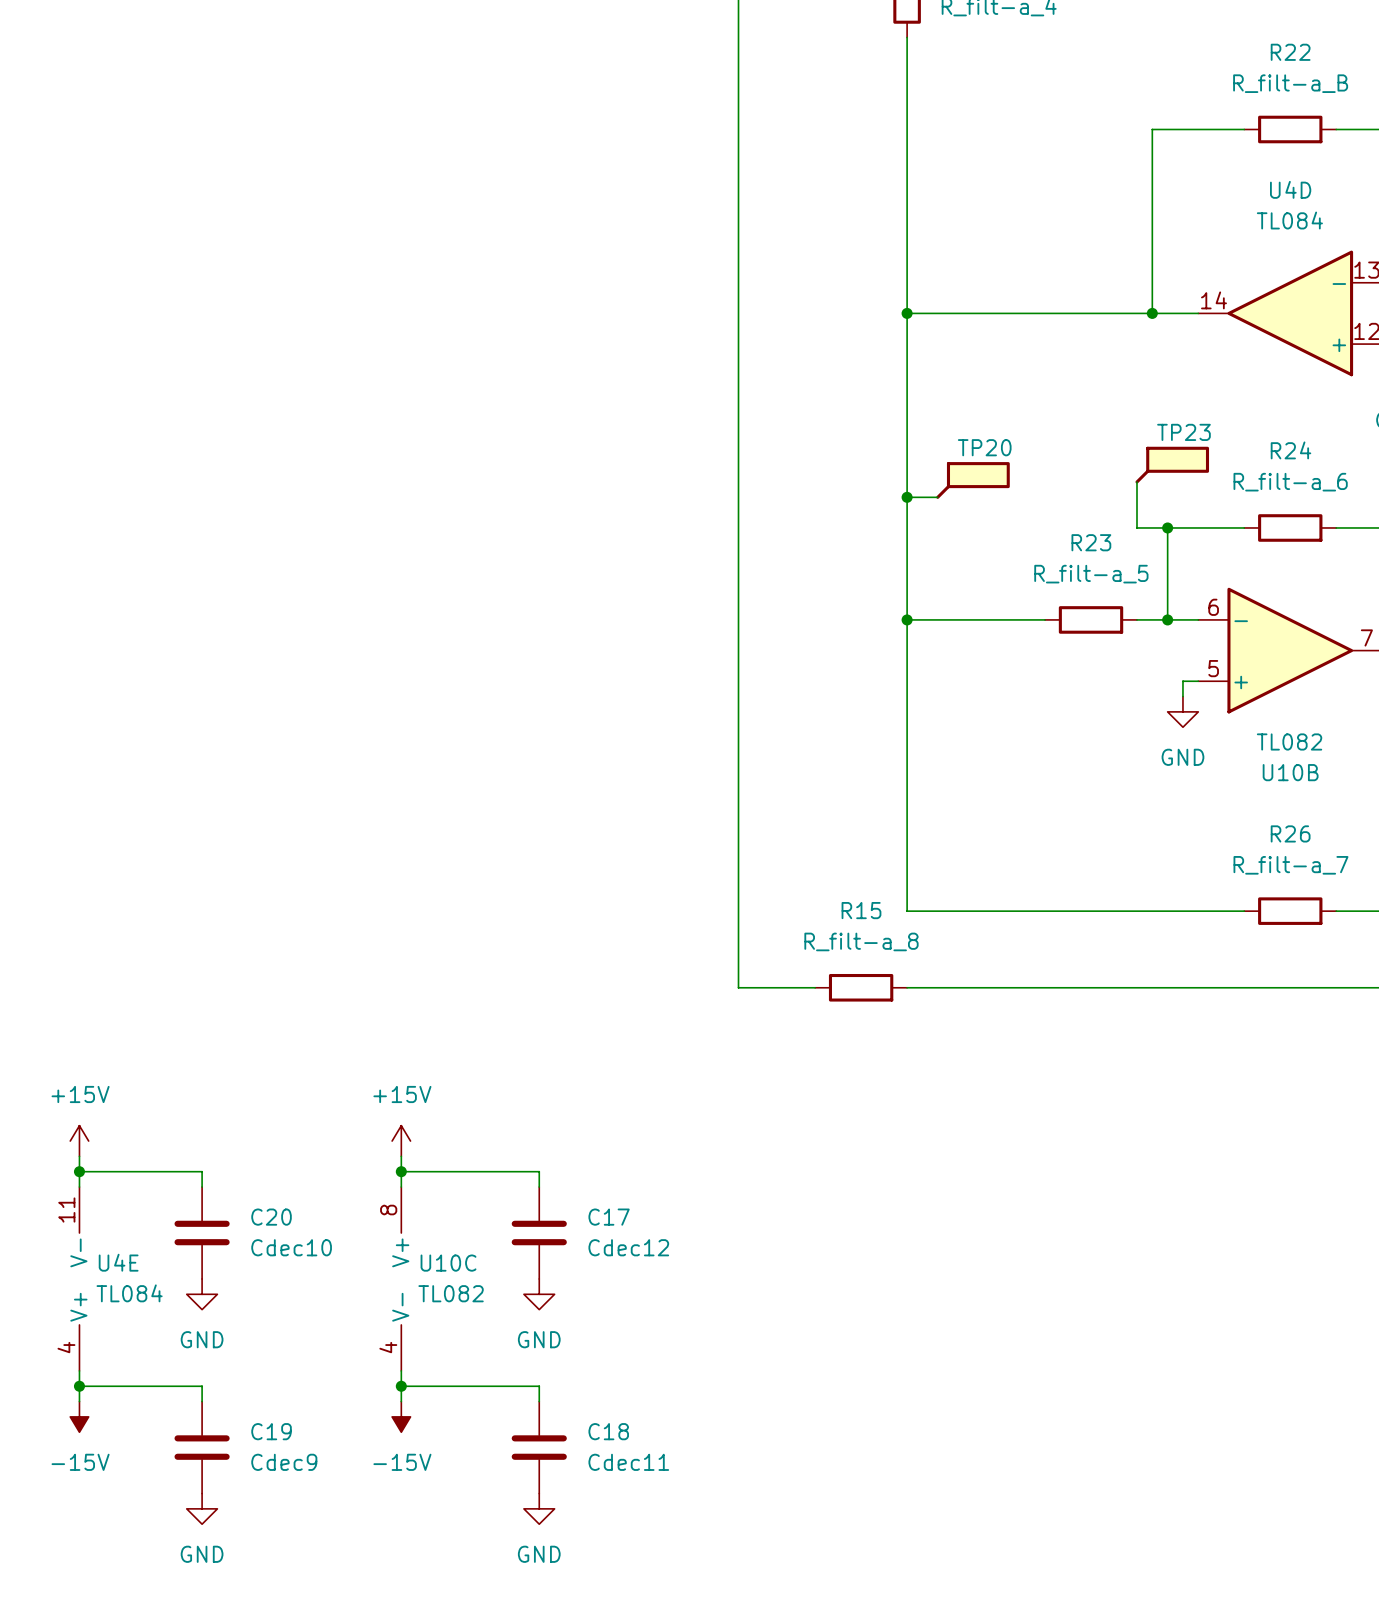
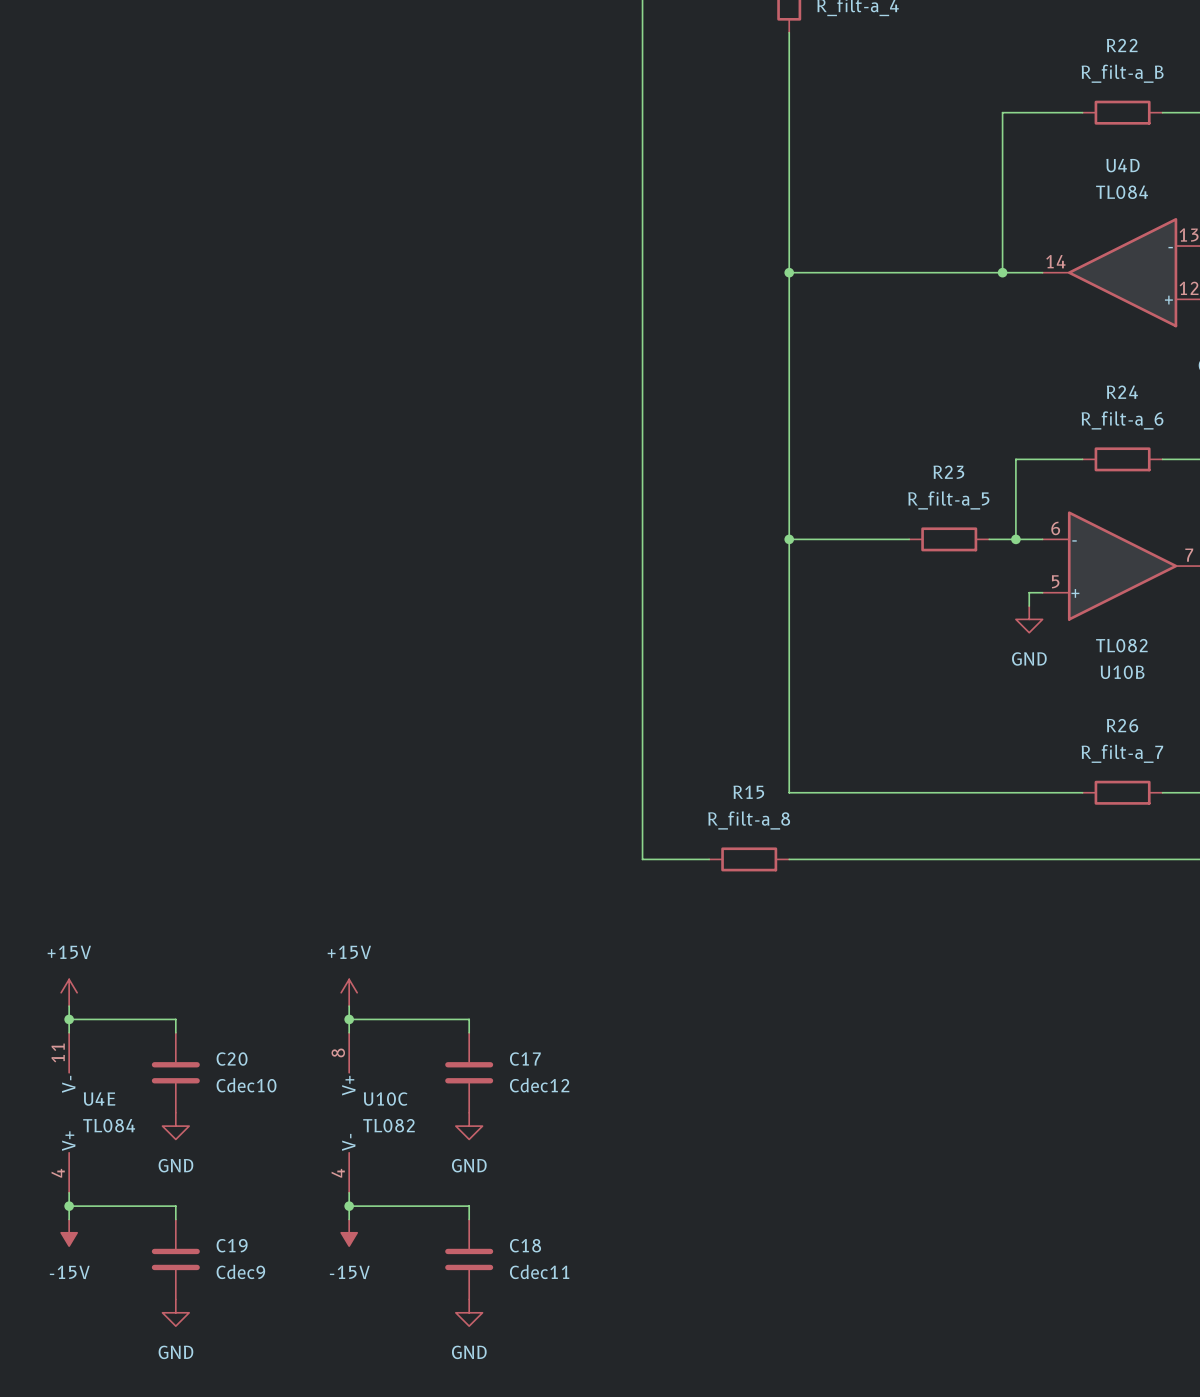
TP23: (1172, 465) -> none
TP20: (973, 480) -> none
wire: (1136, 482) (1136, 527) (1167, 527) -> none
wire: (907, 497) (937, 497) -> none
junction: (907, 497) -> none
junction: (1167, 527) -> none

